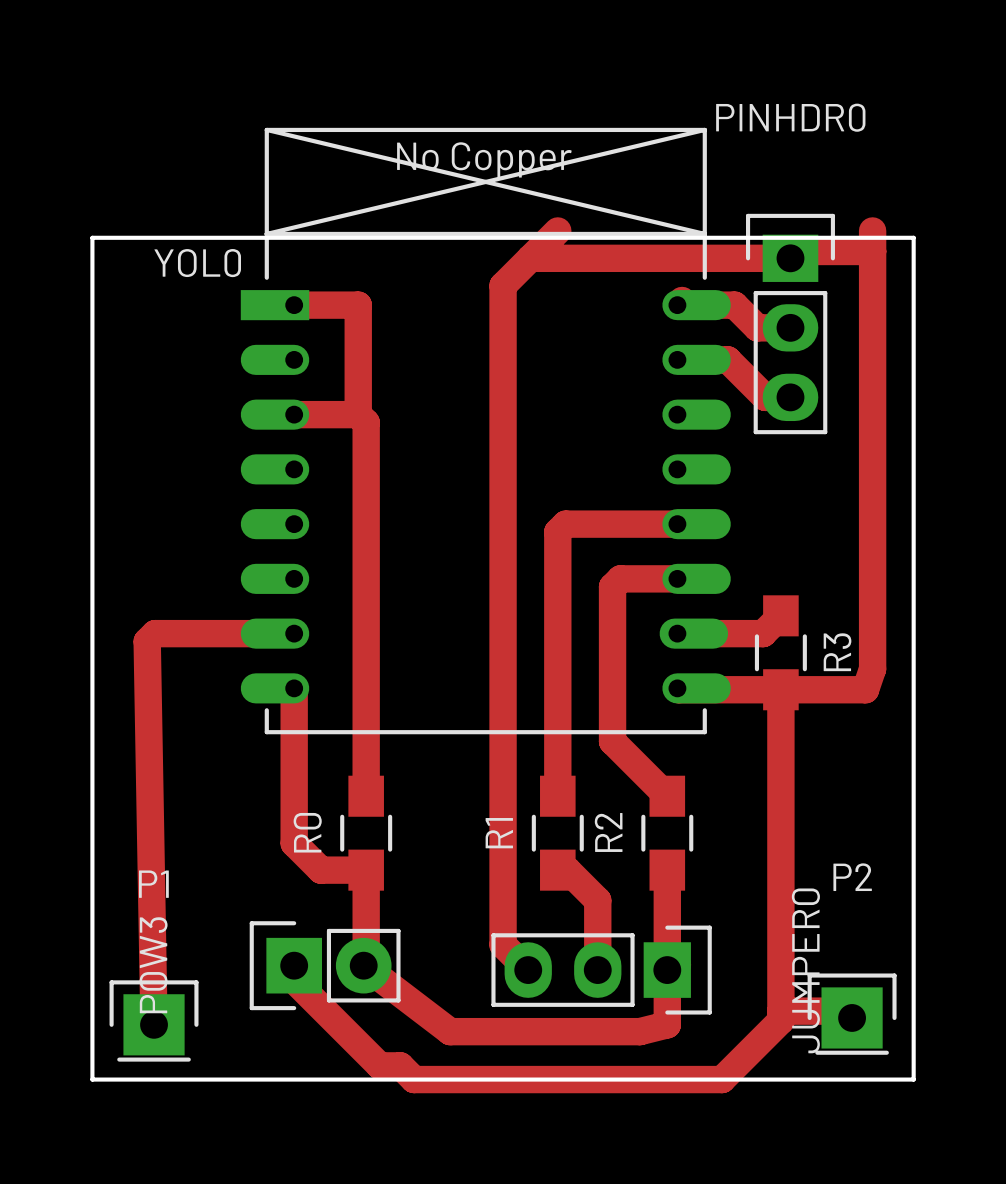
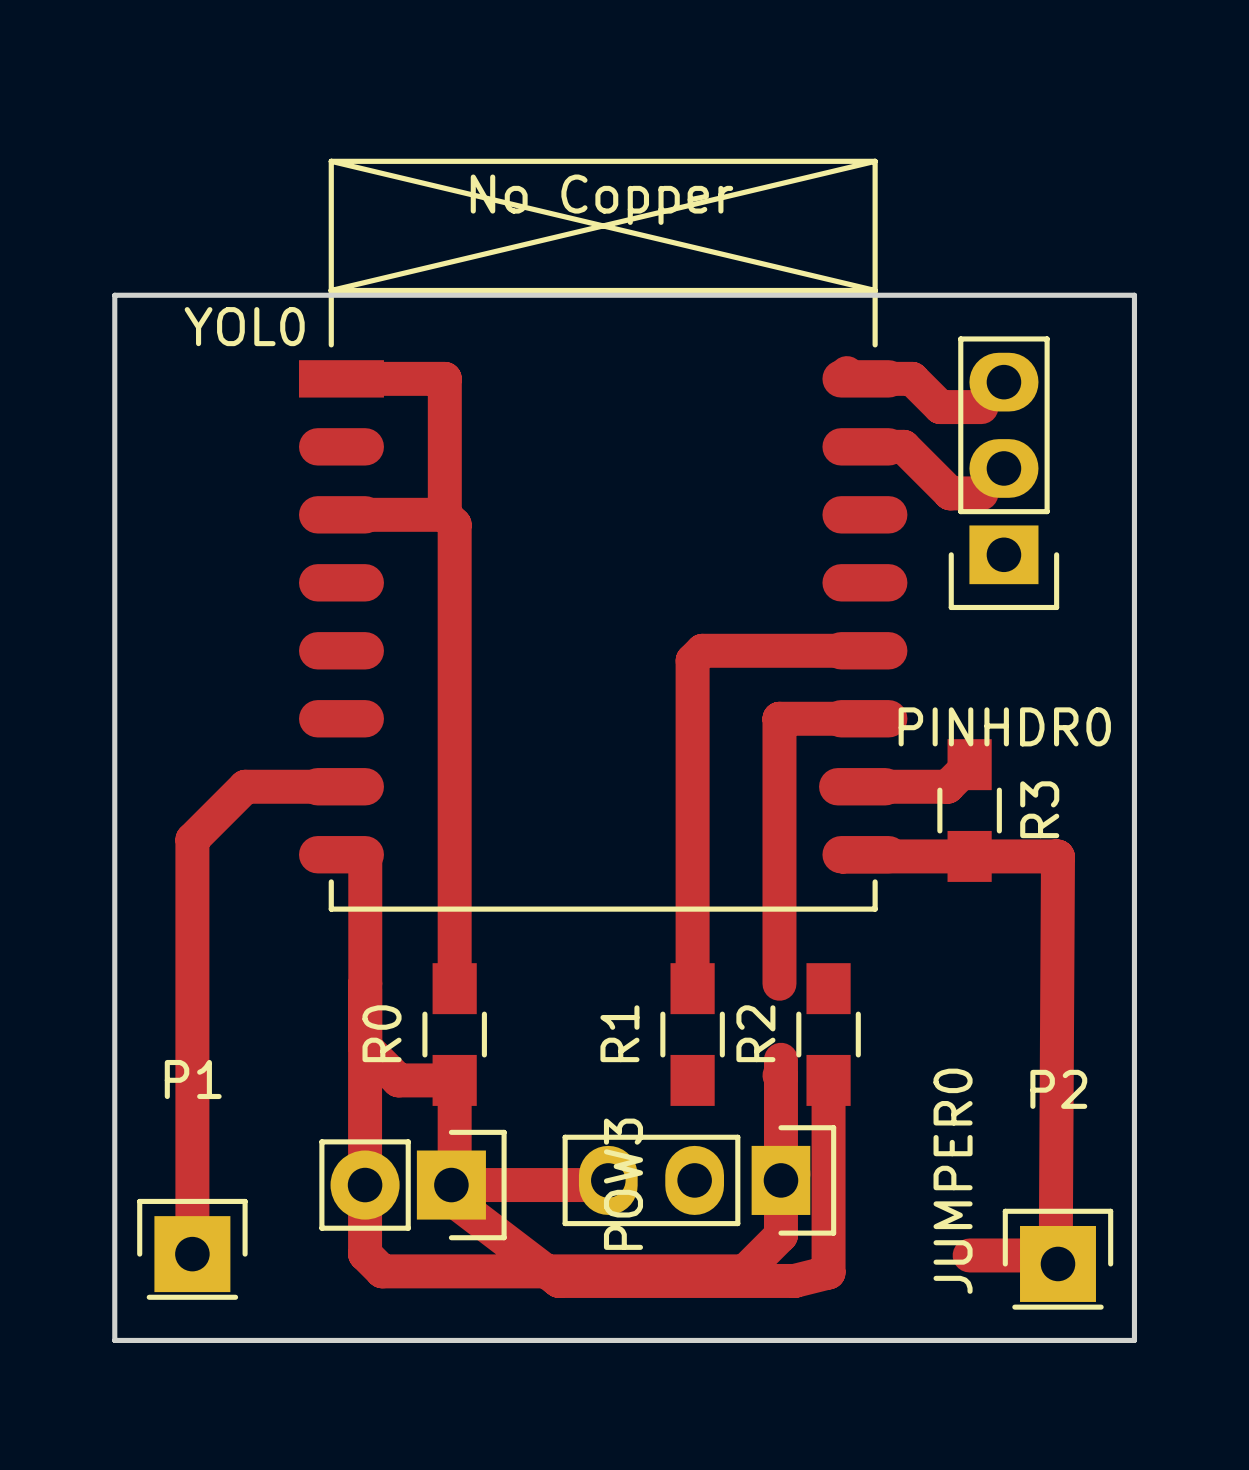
YOL0 footprint: [240, 127, 731, 735] -> [298, 158, 908, 912]
top track: (557, 230) (503, 285) (503, 944) (528, 970) -> none
top track: (872, 230) (872, 668) (865, 689) (851, 689) -> (1047, 1245) (1055, 1254) (1057, 856)
top track: (872, 251) (797, 251) (790, 258) (530, 258) -> none
PINHDR0 rotation: 0° (790, 324) -> 180° (1003, 473)
top track: (627, 578) (620, 578) (612, 586) (612, 741) (667, 796) -> (779, 718) (779, 983)
top track: (197, 633) (155, 633) (147, 641) (154, 1024) -> (245, 786) (192, 839) (192, 1254)
top track: (780, 689) (780, 1020) (722, 1079) (414, 1079) (400, 1065) (379, 1065) (294, 980) (294, 966) -> none
top track: none -> (365, 989) (365, 1254) (382, 1271) (744, 1271) (780, 1235) (780, 1059)
top track: (557, 870) (567, 870) (597, 900) (597, 970) -> none
top track: none -> (608, 1180) (603, 1185) (451, 1185)
POW3 rotation: 0° (325, 965) -> 180° (412, 1185)
JUMPER0 position: (601, 970) -> (699, 1180)
P1 position: (154, 1020) -> (192, 1249)

